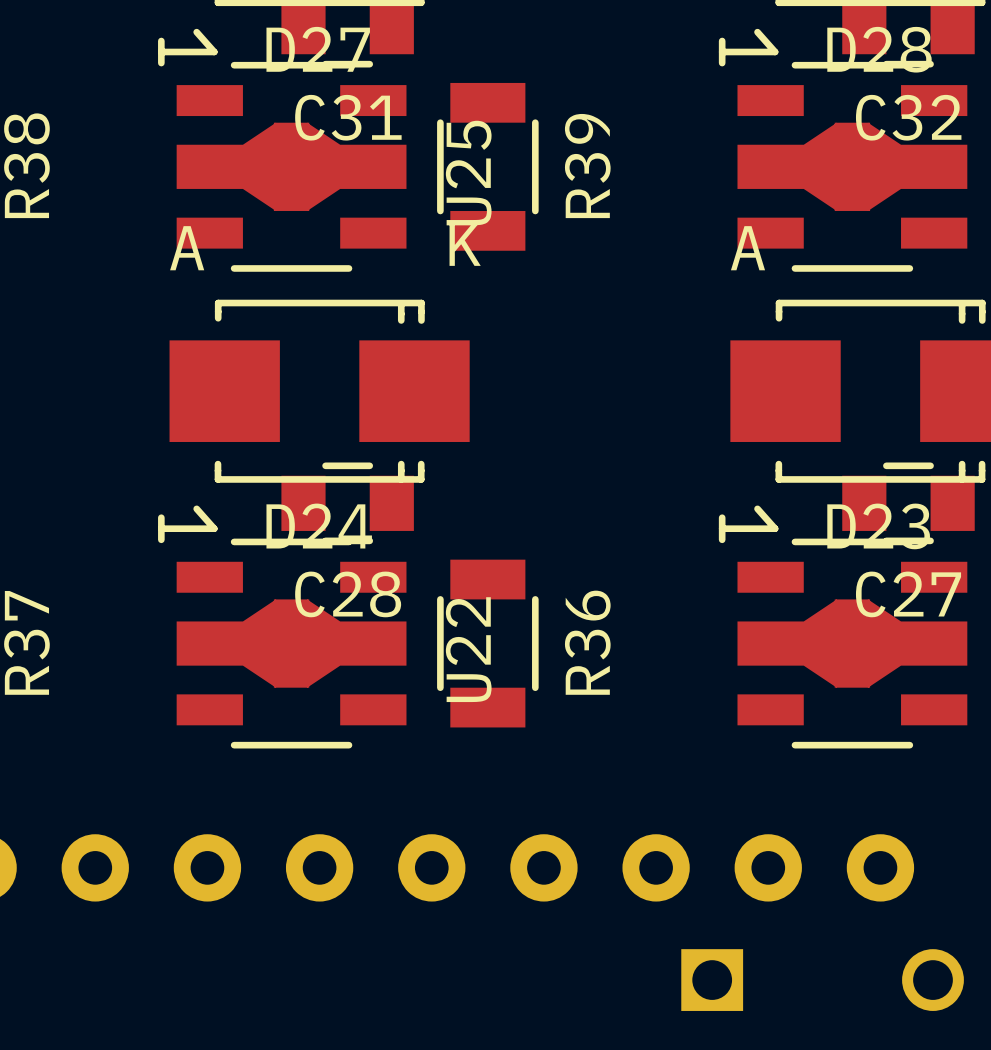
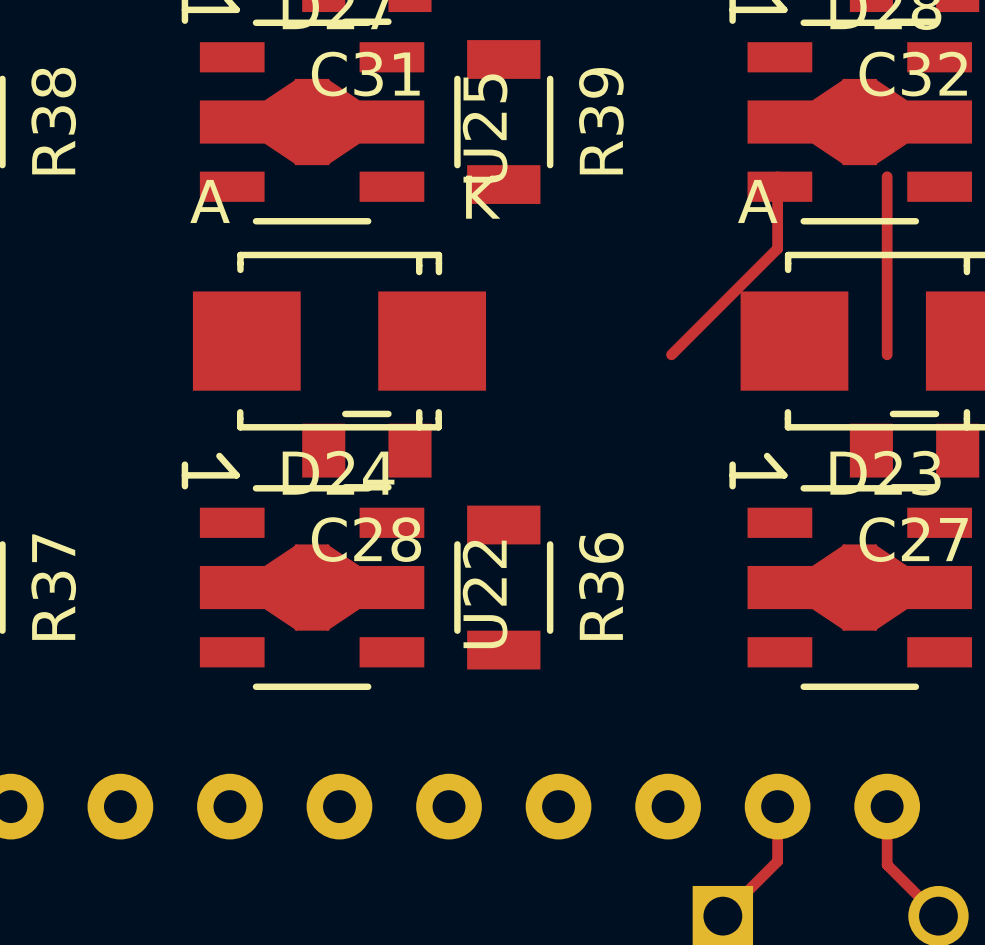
track: none -> (777, 176) (777, 248) (671, 354)
track: none -> (887, 176) (887, 354)
track: none -> (777, 806) (777, 861) (722, 916)
track: none -> (887, 806) (887, 864) (938, 916)

